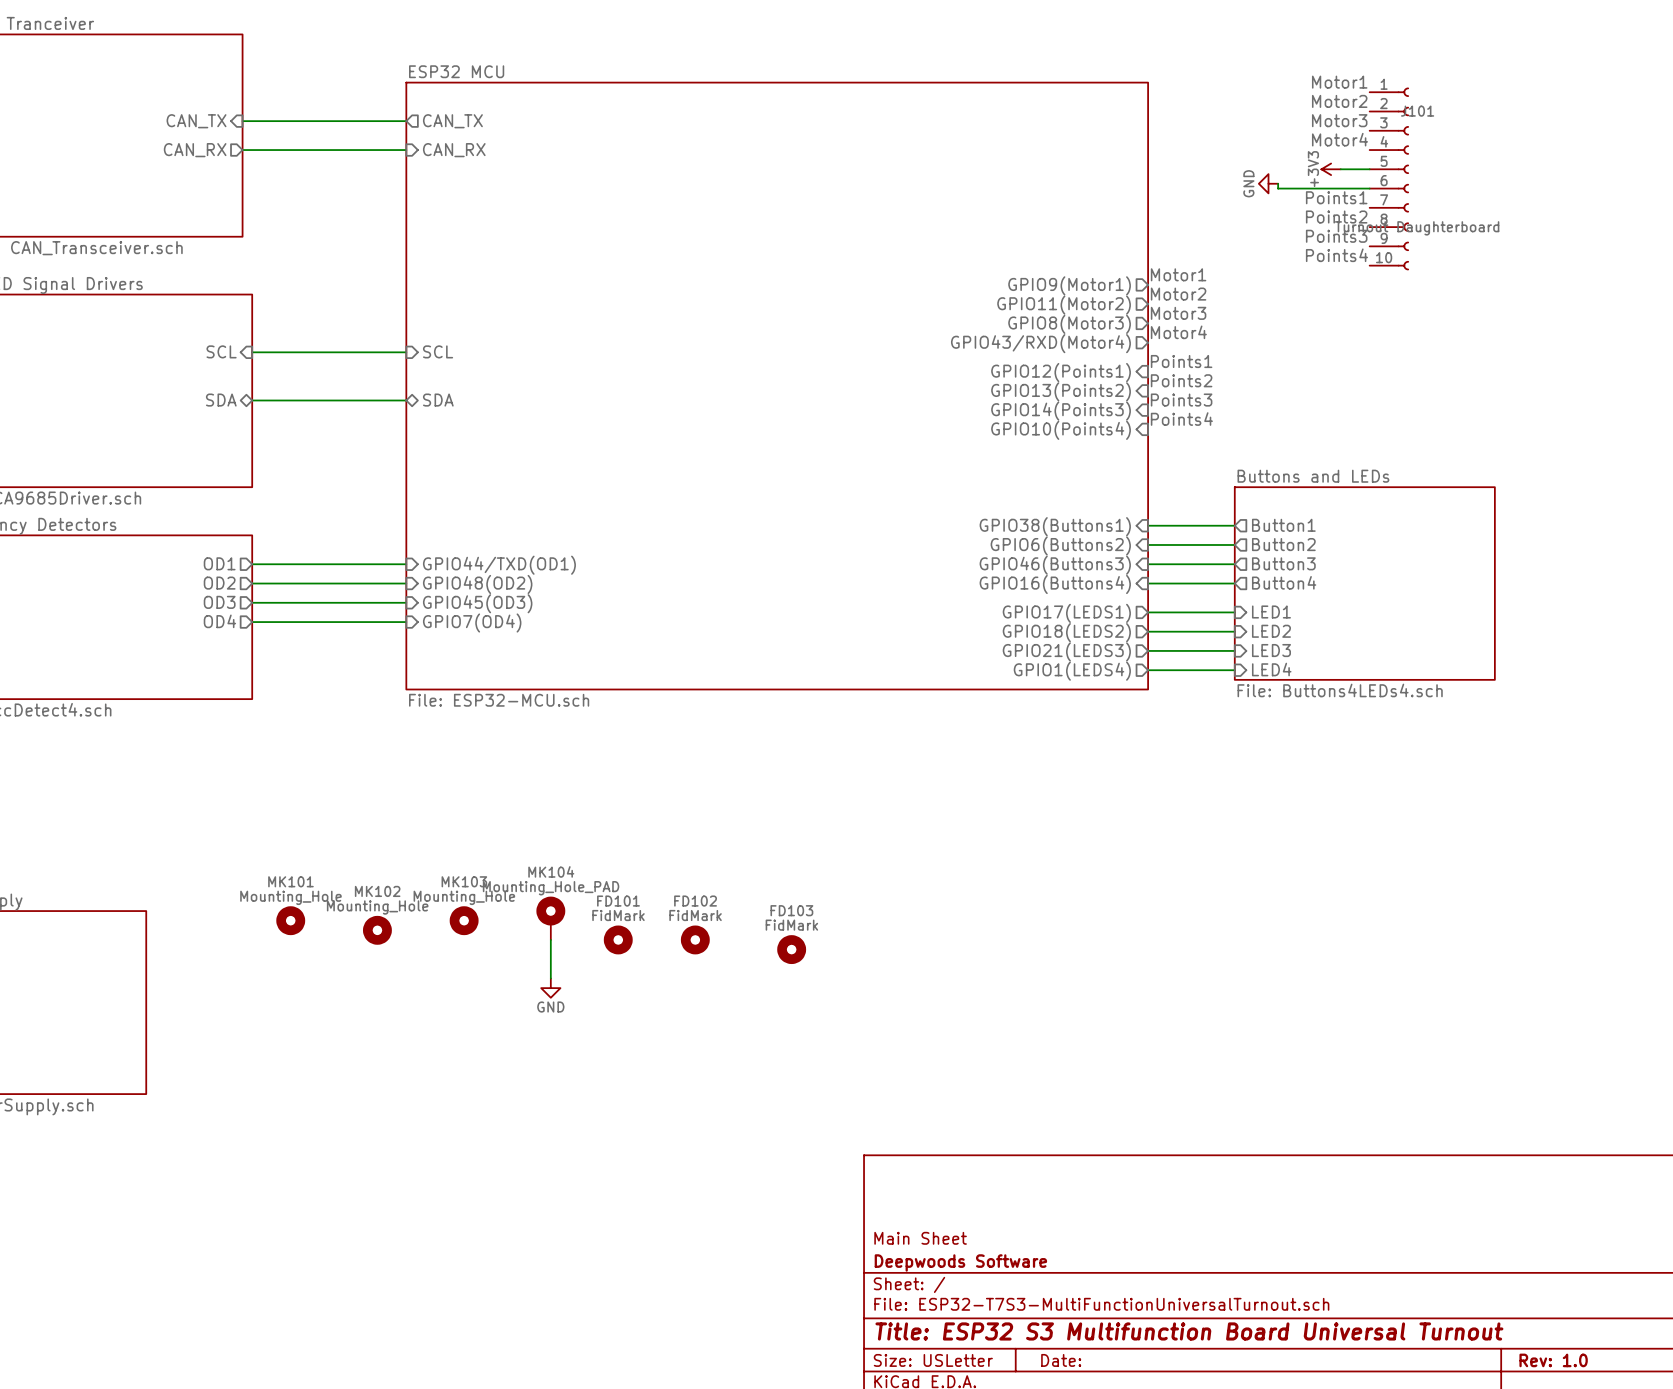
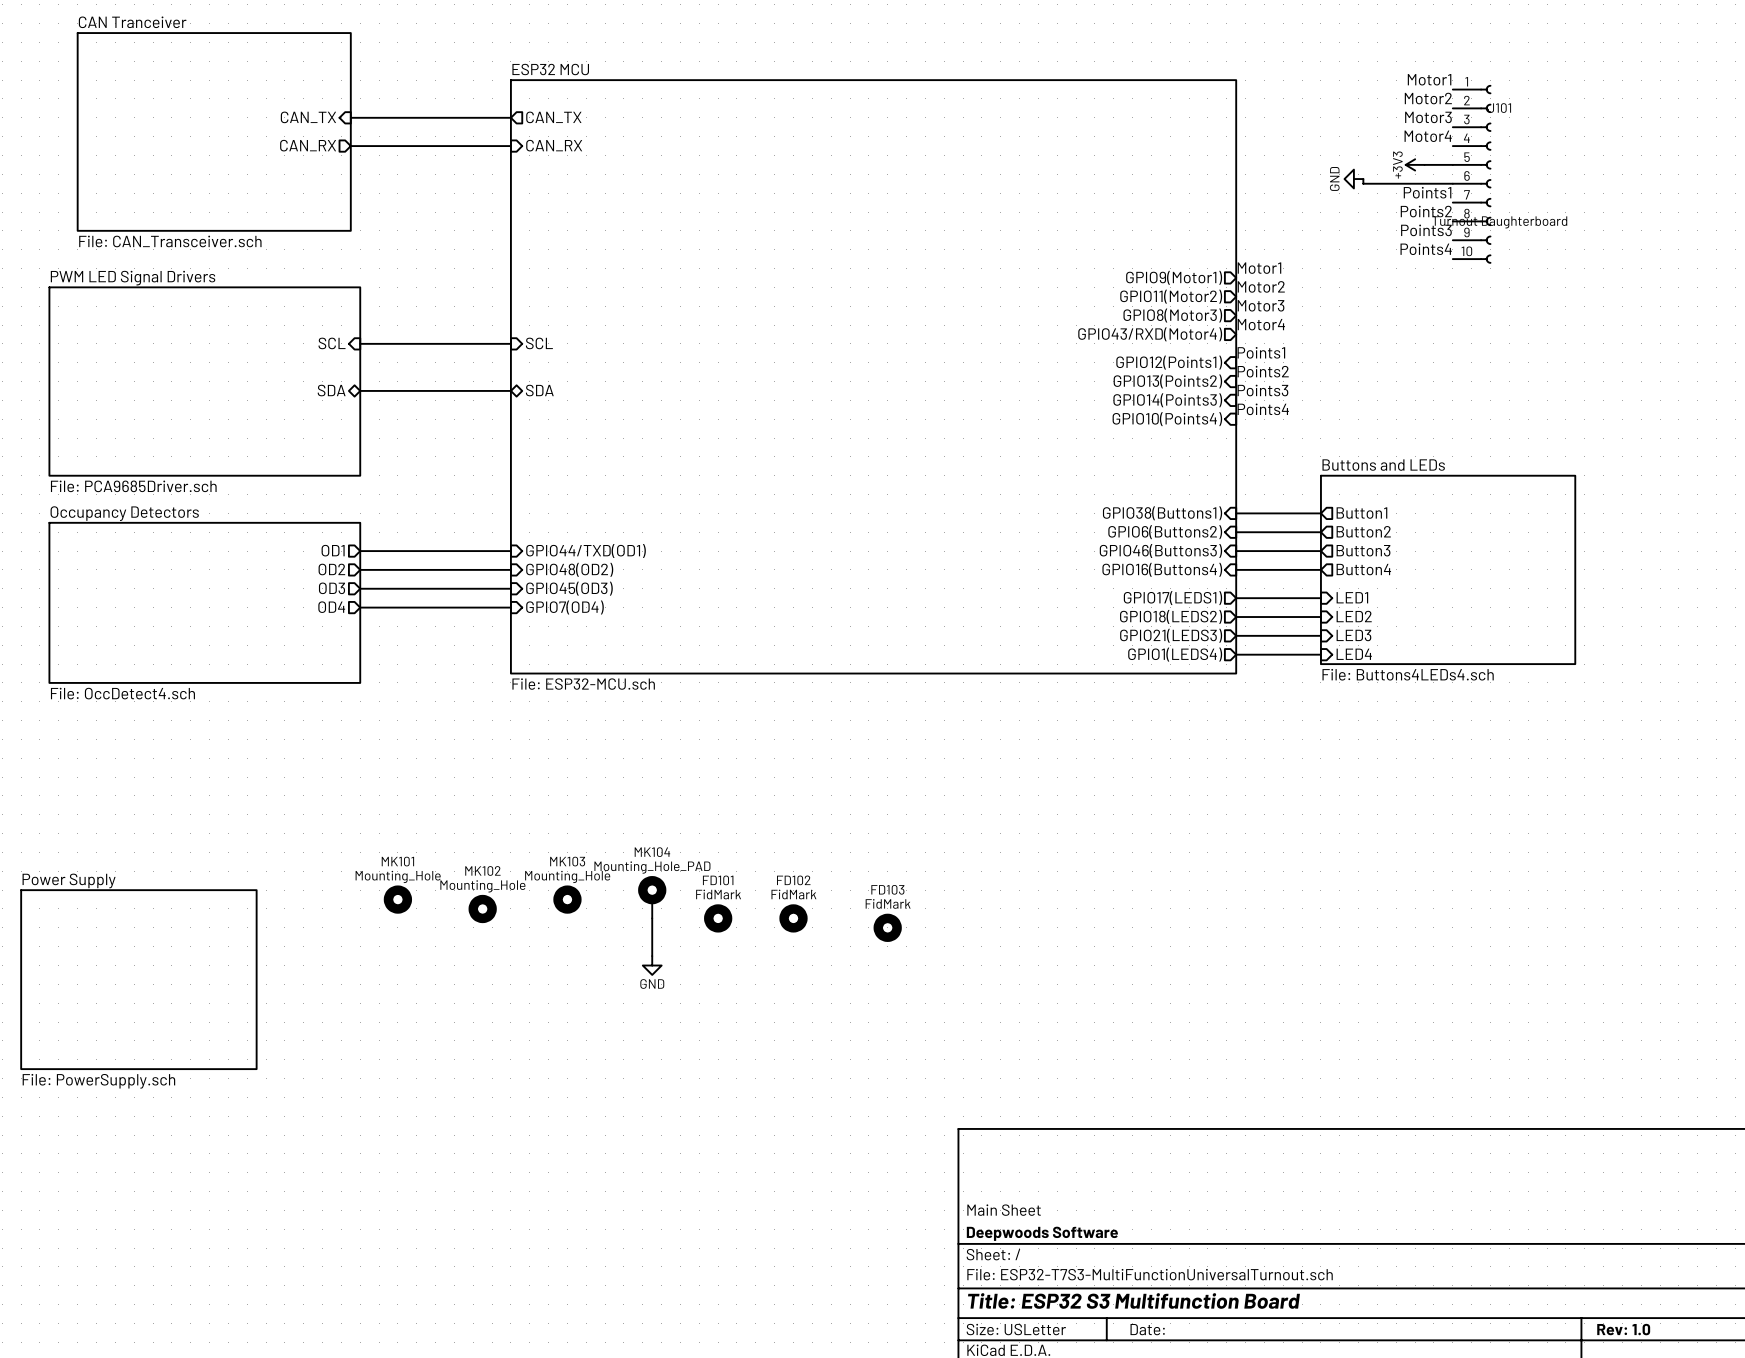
title block: Title: ESP32 S3 Multifunction Board Universal Turnout (1189, 1331) -> Title: ESP32 S3 Multifunction Board (1133, 1300)

